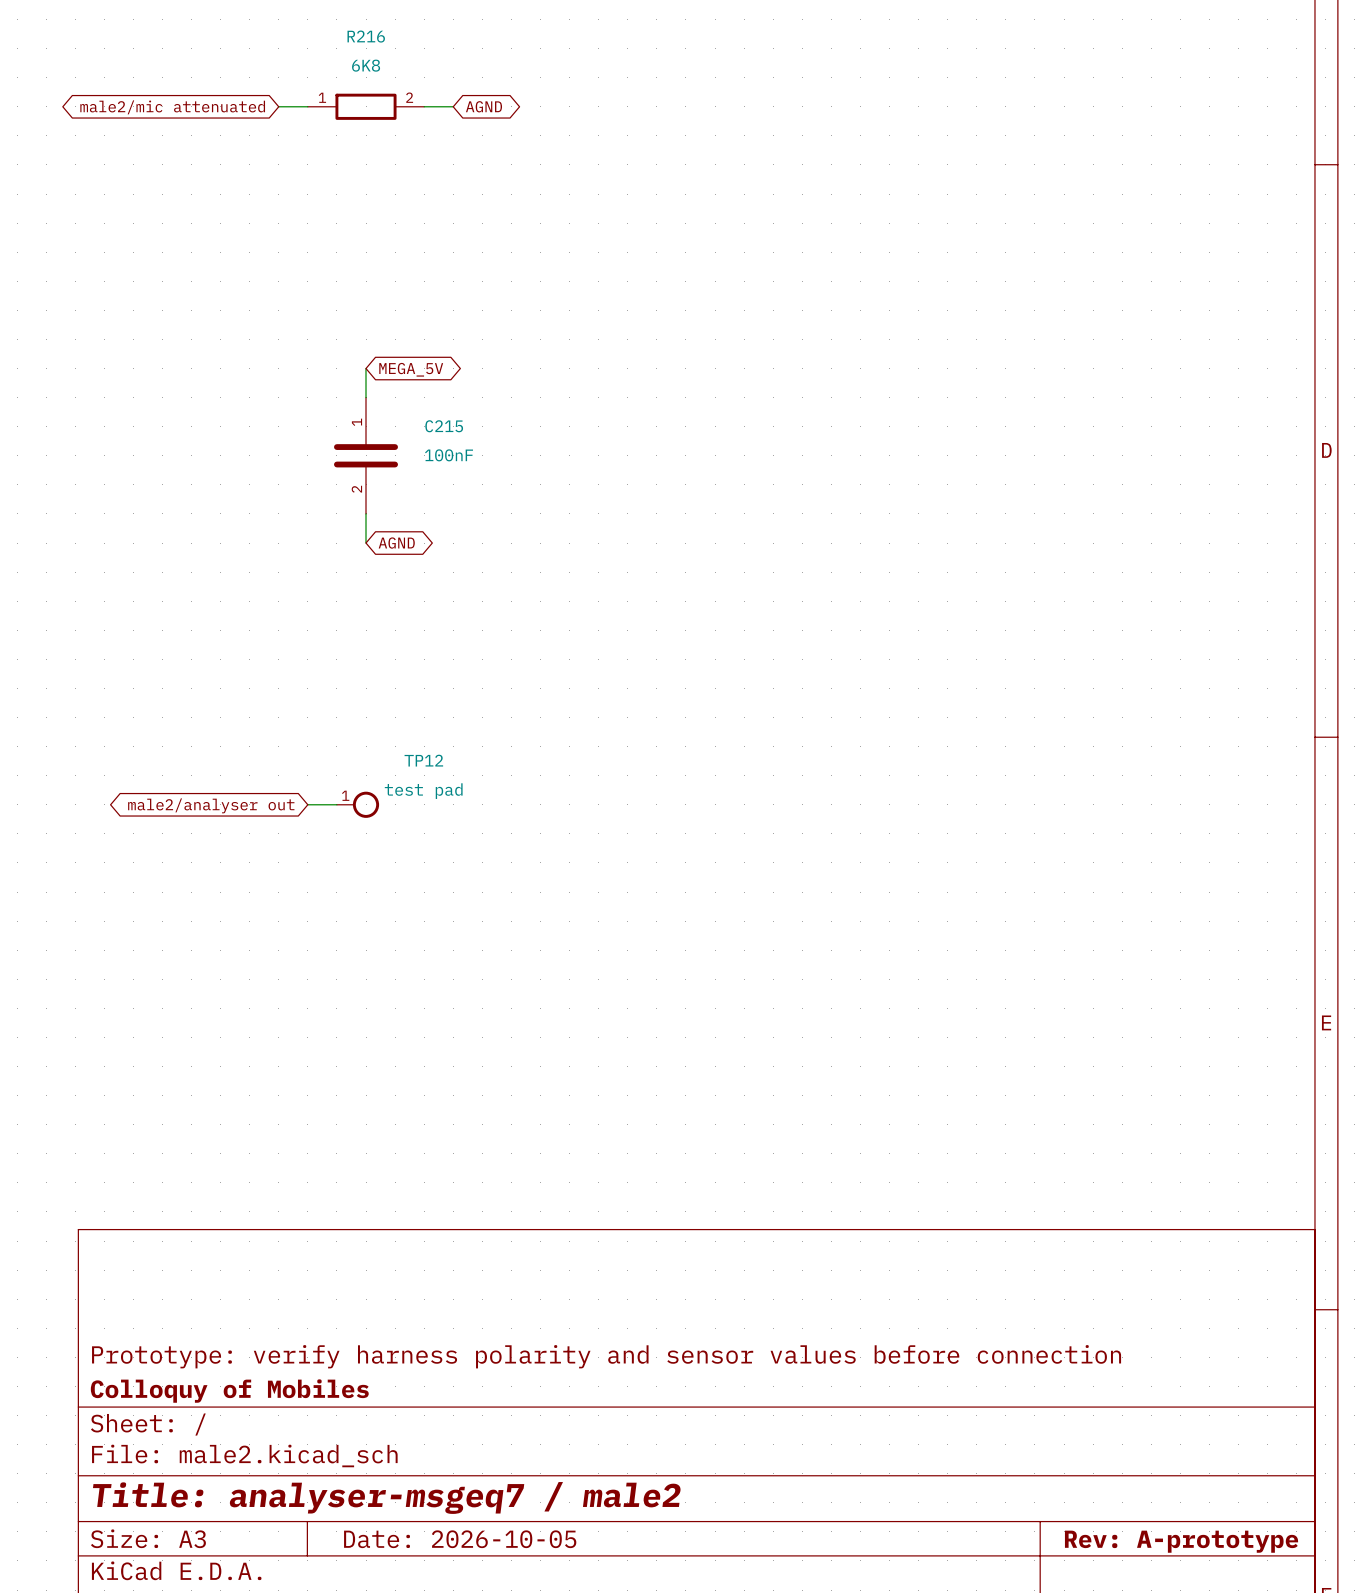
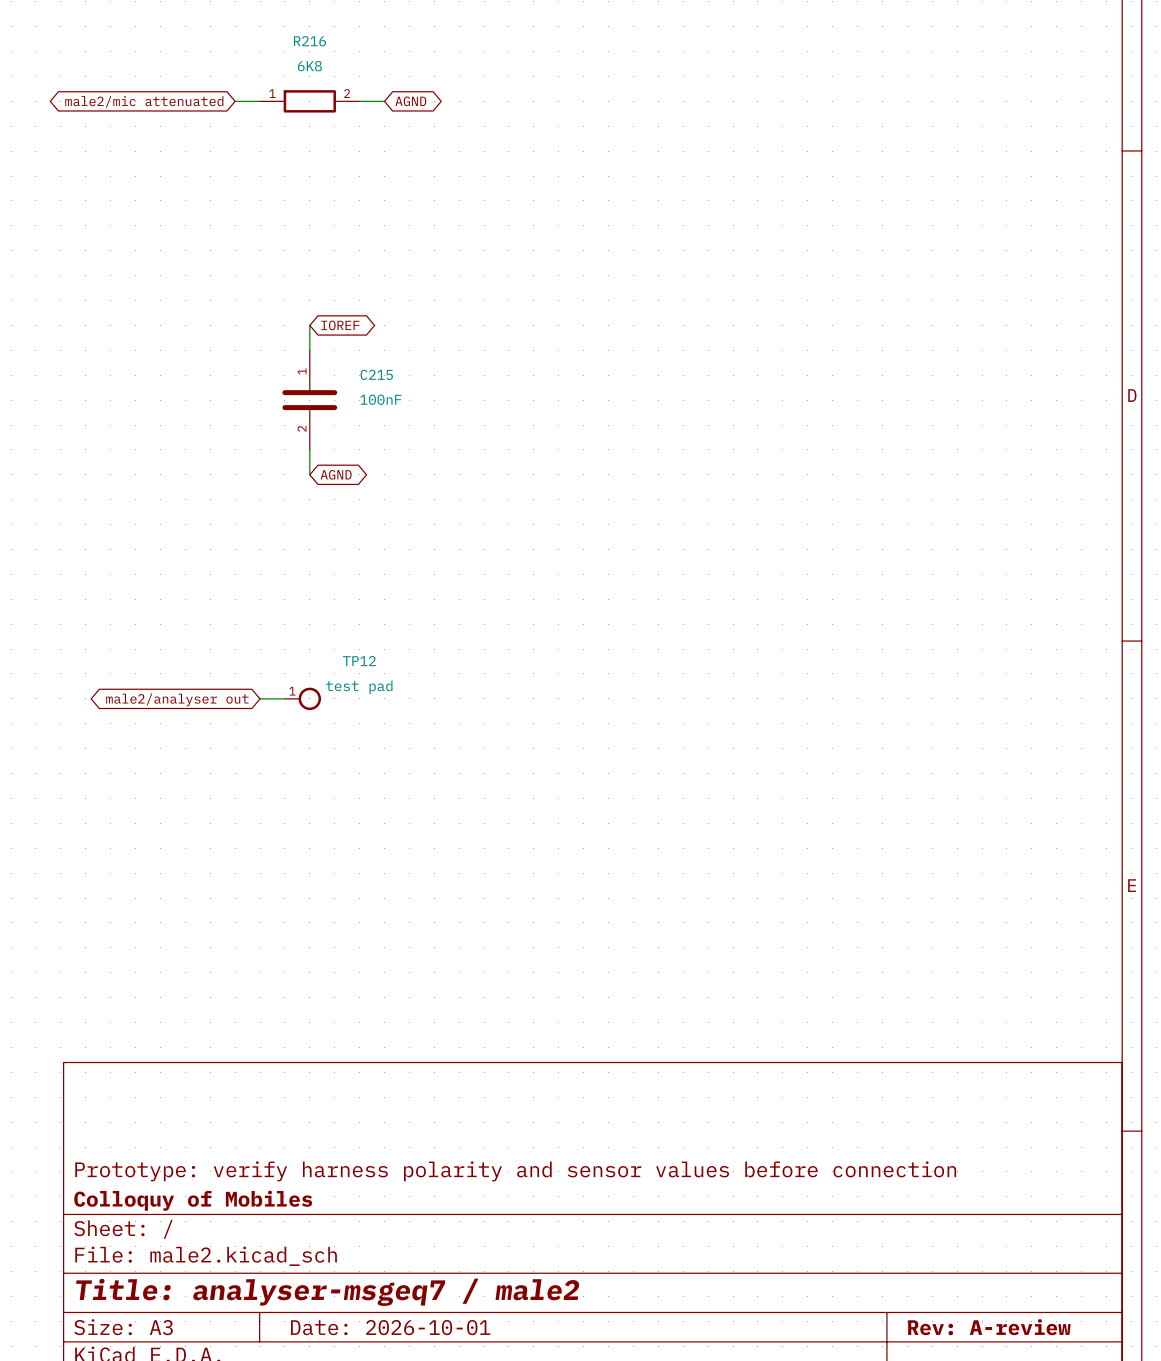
global label: MEGA_5V (411, 369) -> IOREF (340, 325)
title block: Date: 2026-10-05 (460, 1539) -> Date: 2026-10-01 (390, 1327)
title block: Rev: A-prototype (1181, 1541) -> Rev: A-review (989, 1327)

